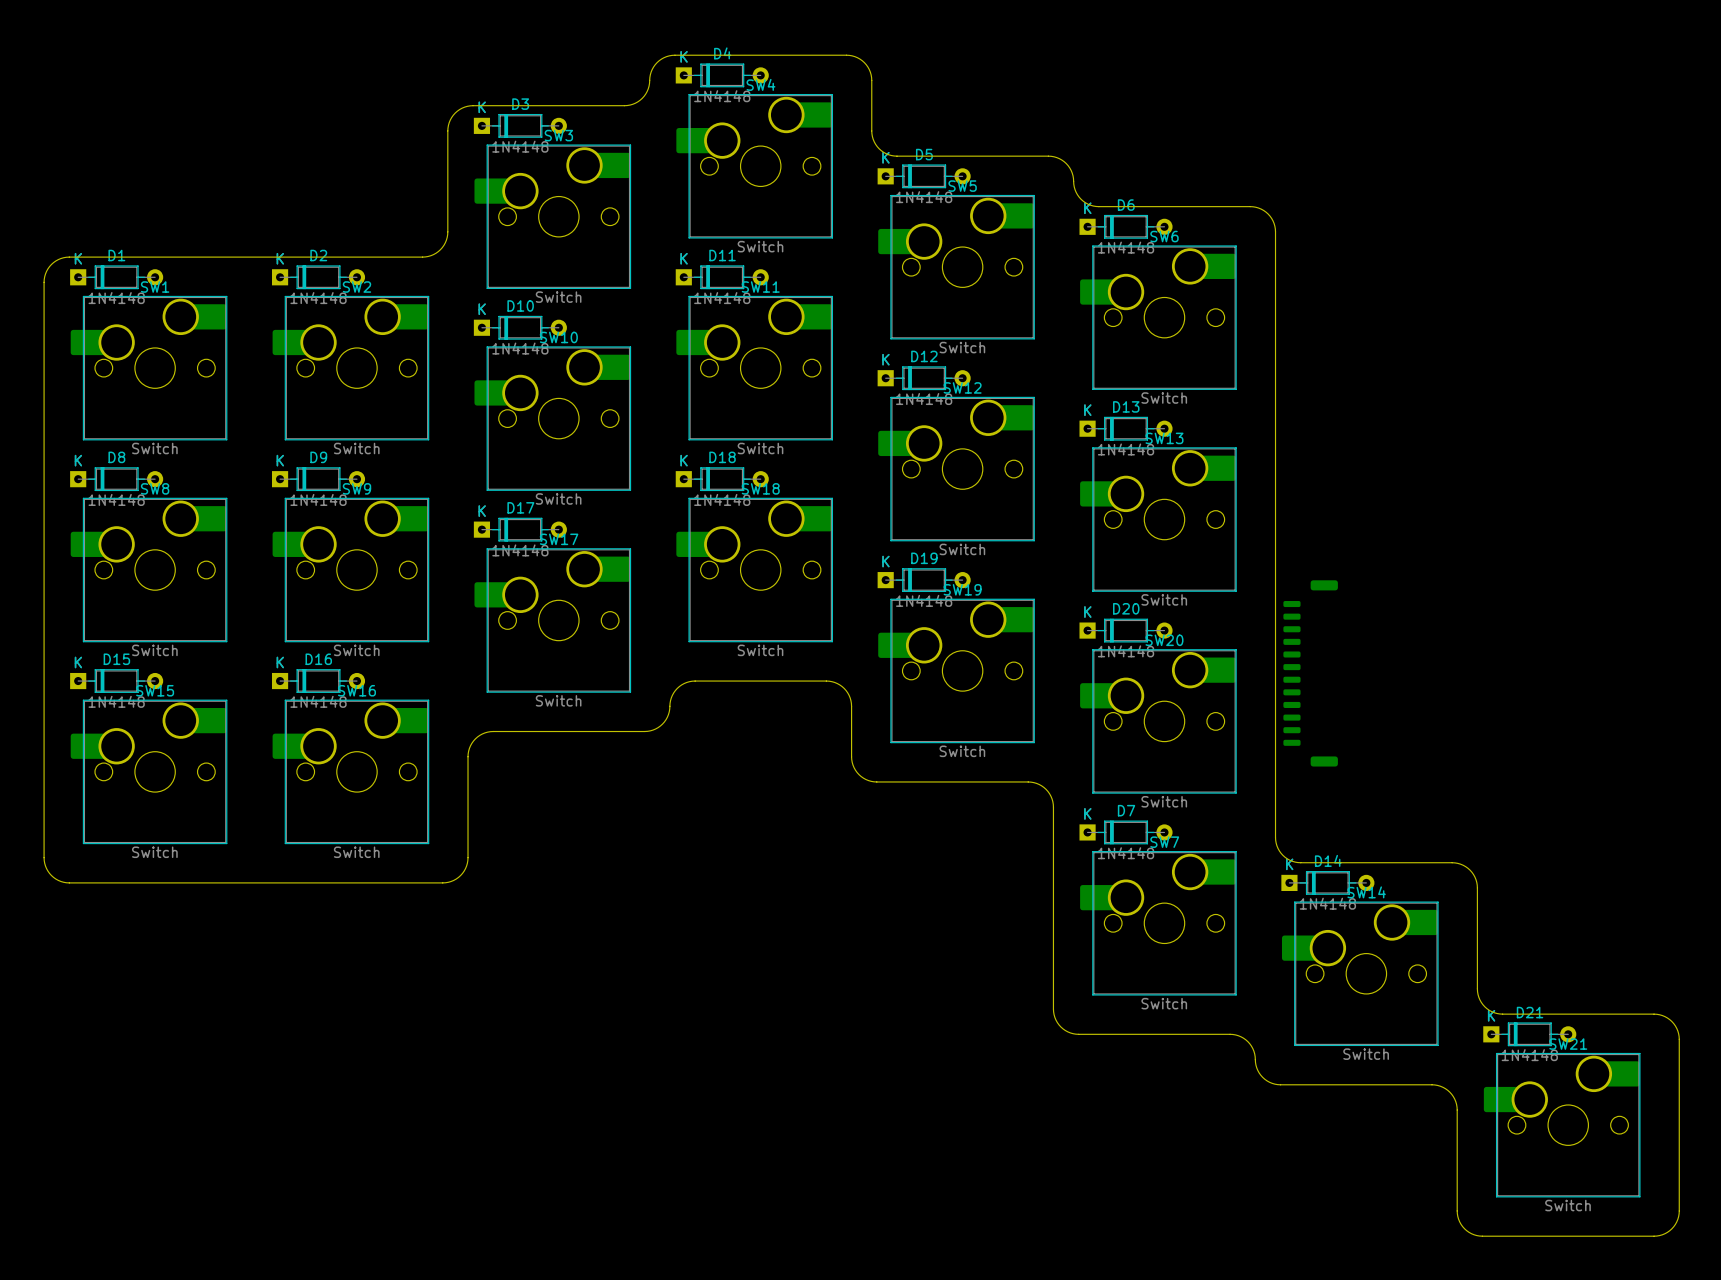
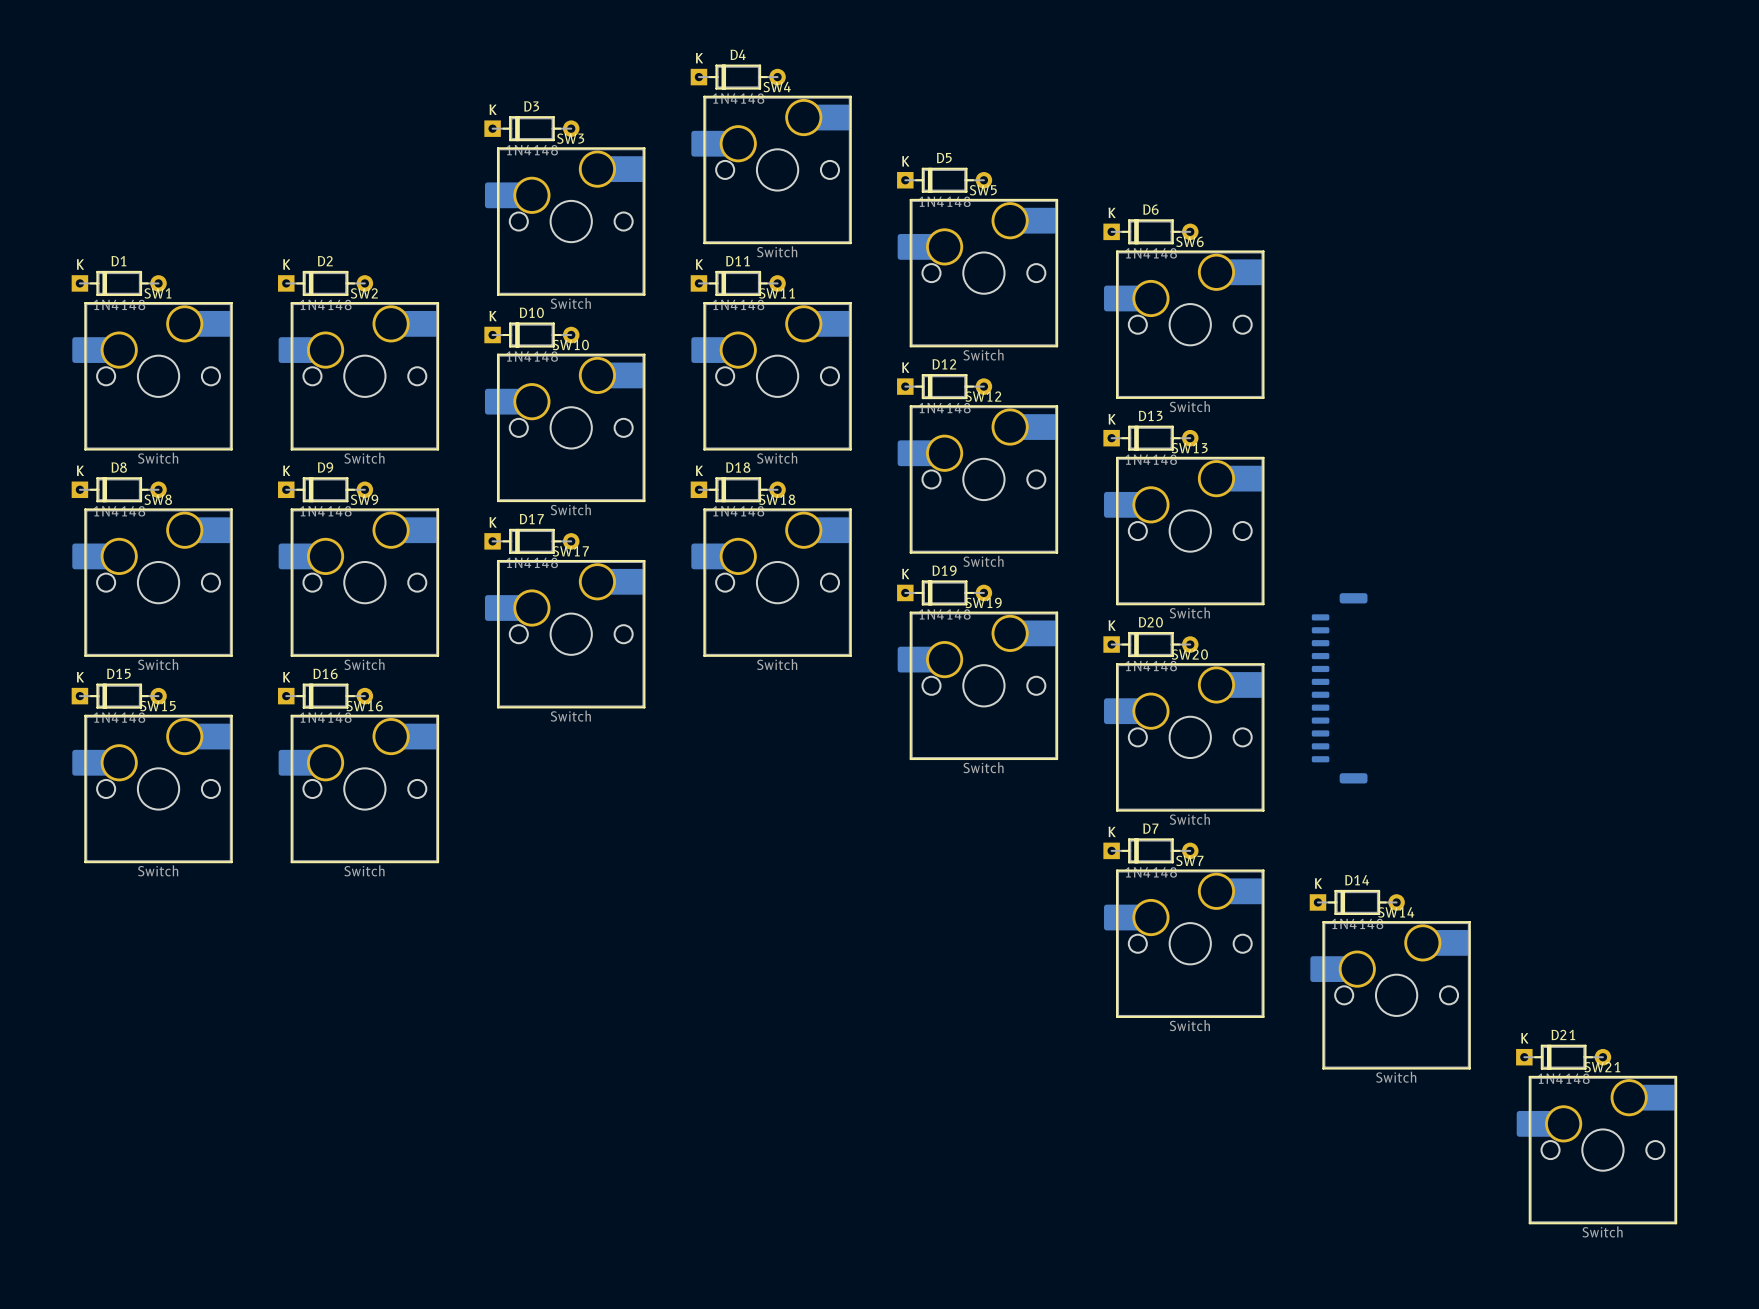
board edge: (674, 55) (852, 55) (862, 60) (870, 72) (872, 136) (877, 146) (888, 154) (1051, 156) (1059, 158) (1068, 165) (1072, 173) (1077, 194) (1085, 202) (1093, 206) (1253, 206) (1261, 209) (1270, 216) (1275, 231) (1276, 845) (1285, 857) (1297, 862) (1452, 862) (1467, 868) (1473, 874) (1477, 885) (1477, 991) (1481, 1002) (1491, 1011) (1502, 1014) (1654, 1014) (1664, 1016) (1671, 1021) (1676, 1028) (1679, 1039) (1679, 1210) (1676, 1221) (1669, 1230) (1654, 1236) (1474, 1234) (1464, 1228) (1457, 1216) (1457, 1107) (1453, 1096) (1442, 1087) (1431, 1084) (1277, 1084) (1267, 1080) (1260, 1075) (1256, 1067) (1251, 1046) (1243, 1038) (1235, 1034) (1078, 1034) (1065, 1030) (1057, 1022) (1053, 1011) (1053, 807) (1049, 793) (1041, 785) (1031, 782) (876, 781) (865, 779) (857, 772) (852, 762) (850, 697) (842, 686) (831, 681) (689, 681) (679, 686) (673, 692) (668, 714) (664, 722) (658, 727) (647, 731) (493, 731) (482, 734) (471, 743) (468, 753) (467, 863) (460, 875) (448, 882) (69, 882) (58, 880) (49, 873) (44, 857) (44, 282) (49, 266) (58, 259) (69, 257) (430, 255) (440, 249) (447, 237) (447, 128) (451, 117) (457, 111) (473, 105) (630, 105) (640, 100) (645, 93) (651, 72) (657, 62) (666, 56) (674, 55) -> none

